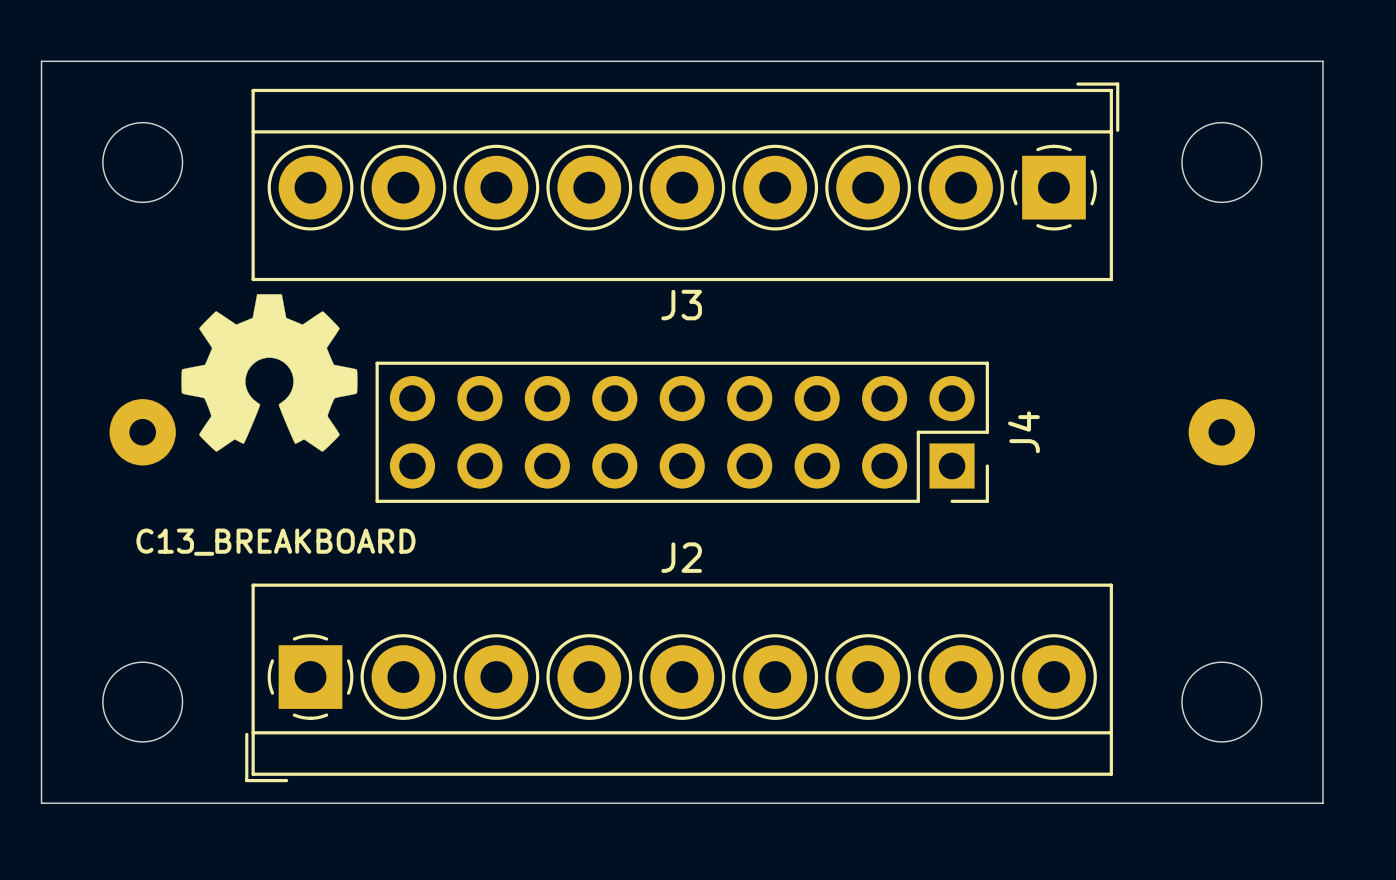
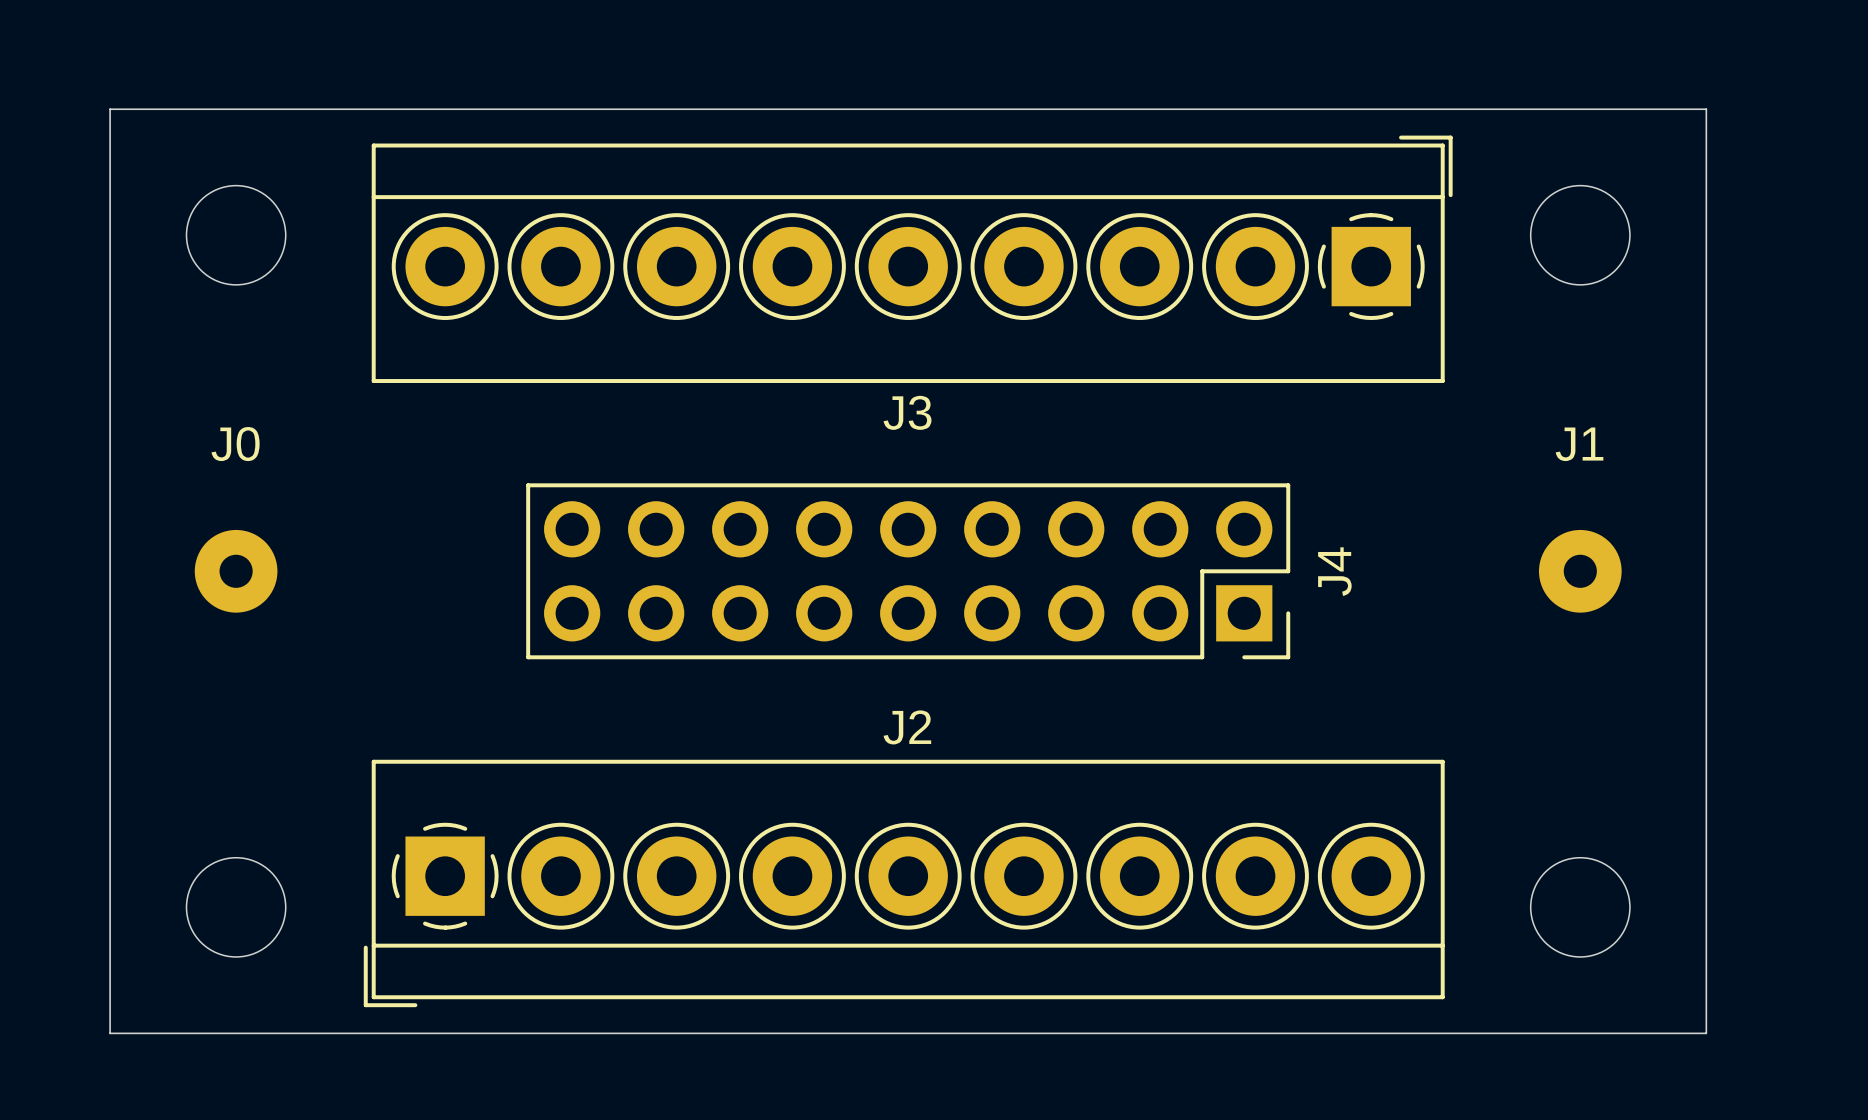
drawing: [181, 294, 358, 452] -> none
J0 name: none -> J0 (235, 444)
J1 name: none -> J1 (1579, 444)
text: C13_BREAKBOARD (275, 542) -> none

